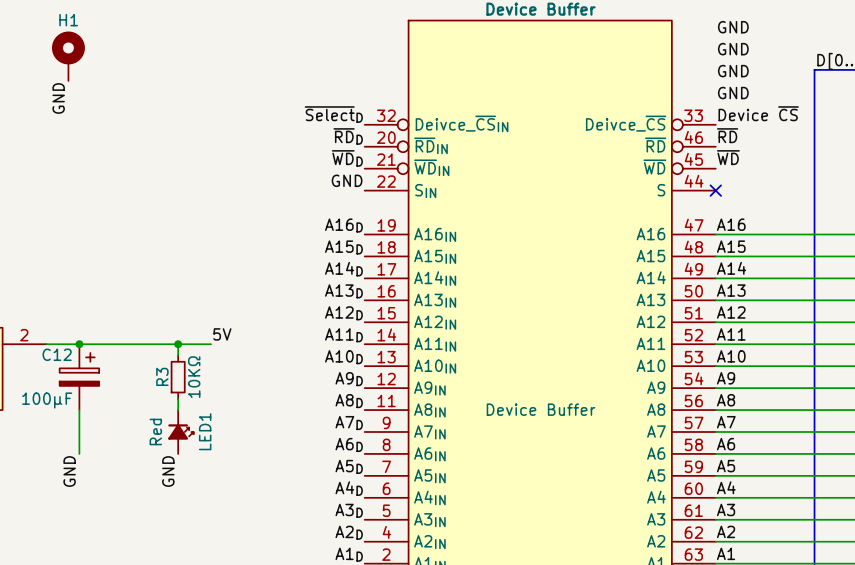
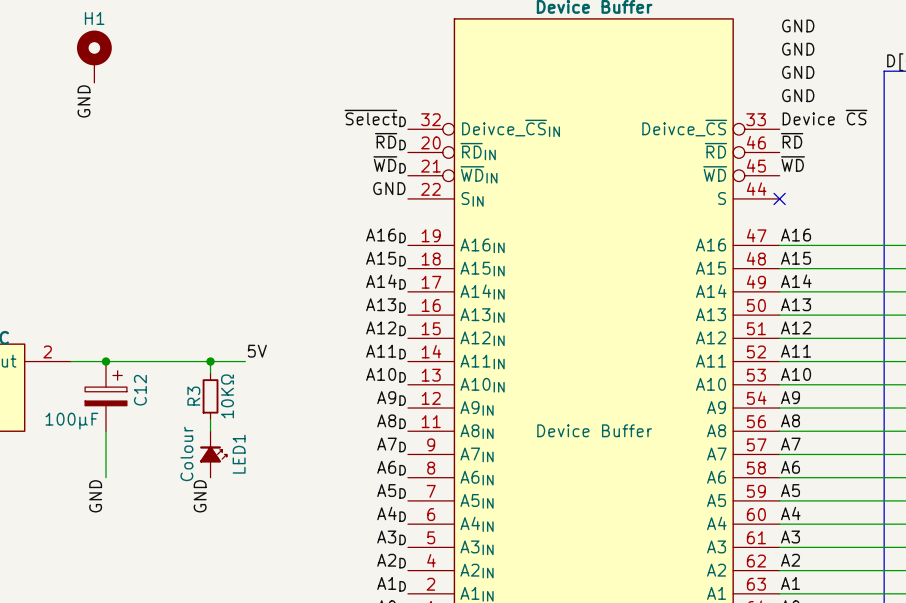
C12 name rotation: 0° (57, 354) -> 90° counterclockwise (140, 390)
C12 name position: C12 (57, 354) -> C12 (140, 390)
LED1 text: none -> Colour (186, 453)
LED1 value: Red (155, 431) -> none

